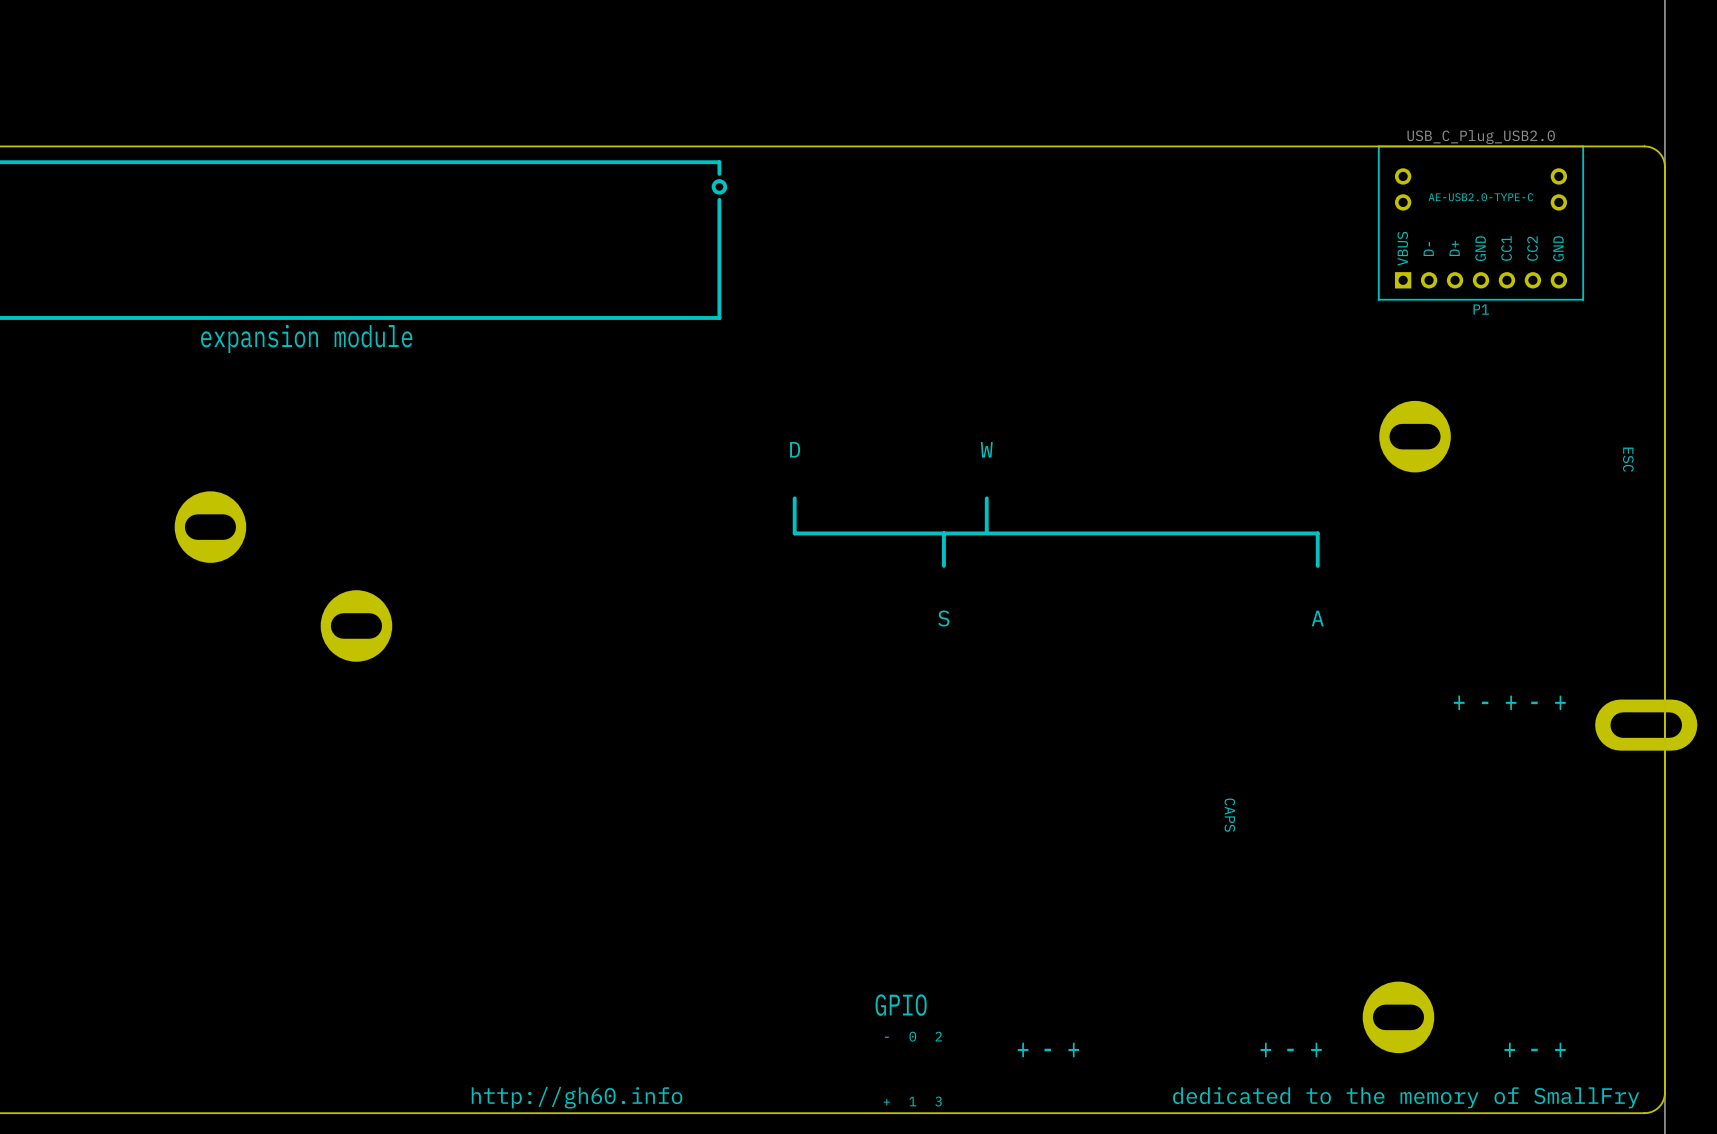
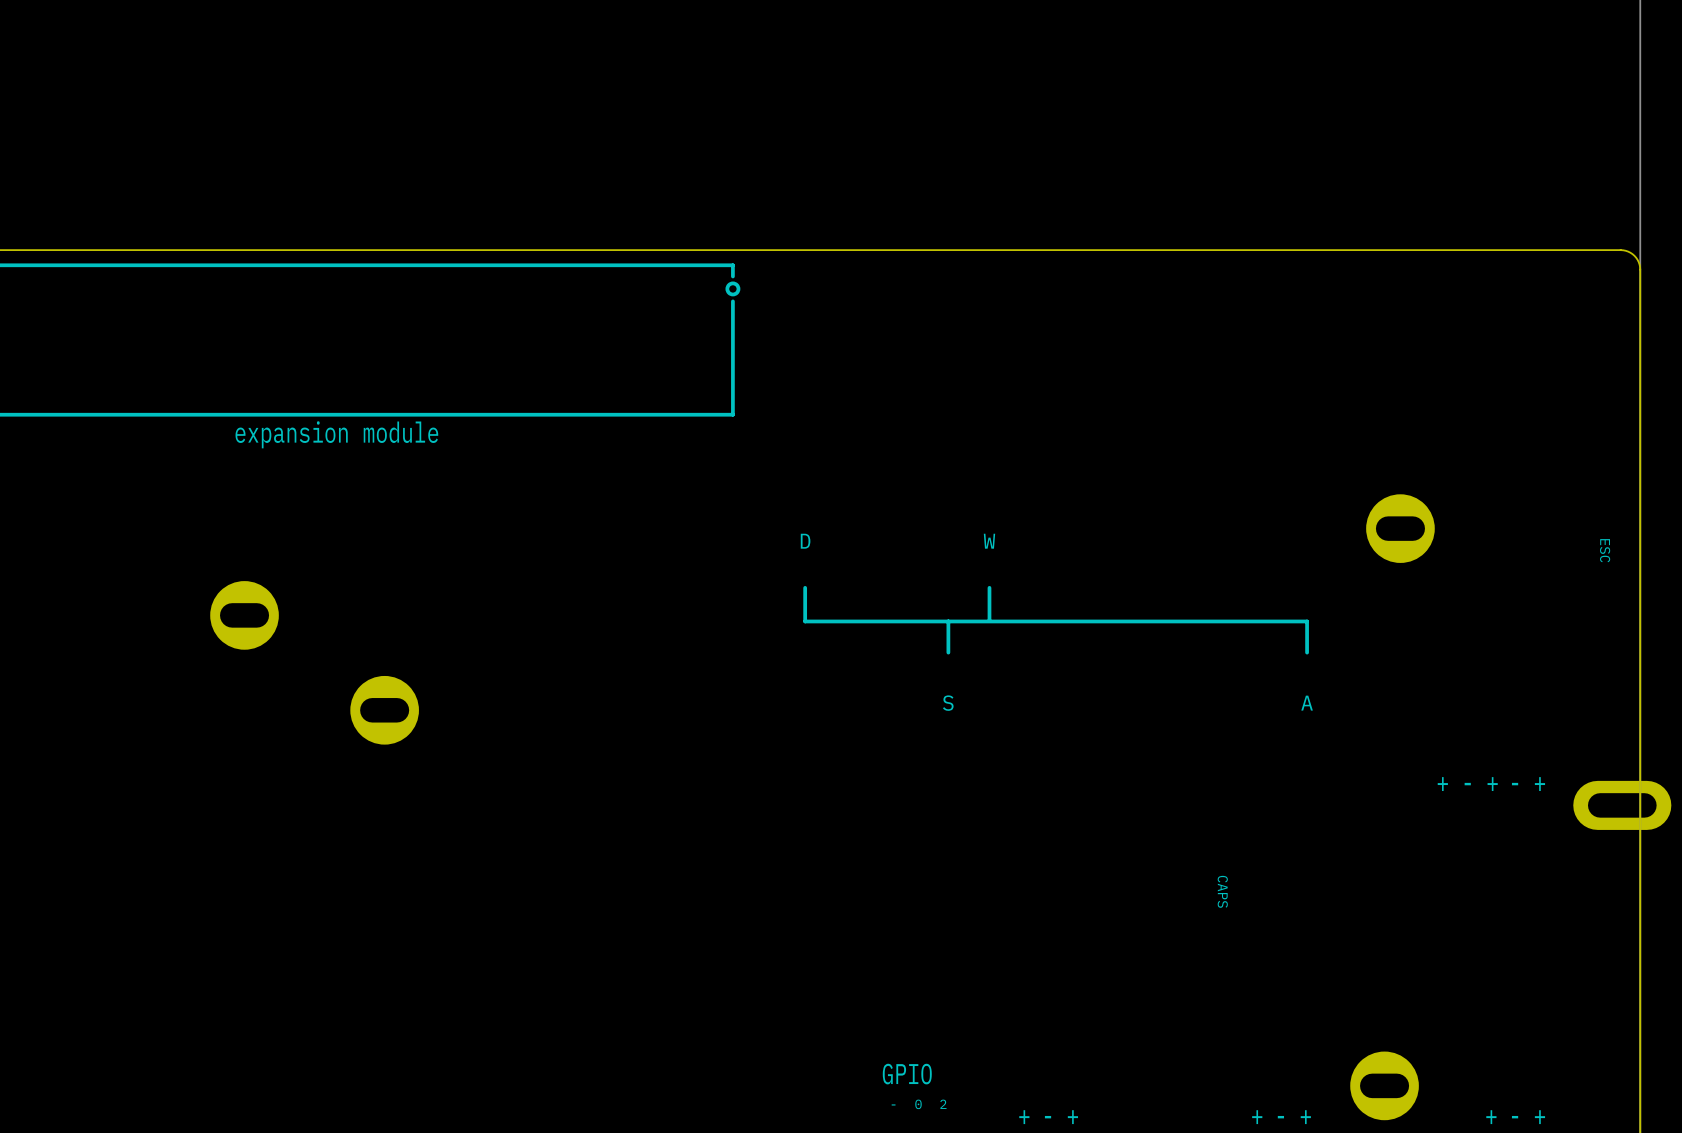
P1: USB_C_Plug_USB2.0 (1480, 223) -> none

